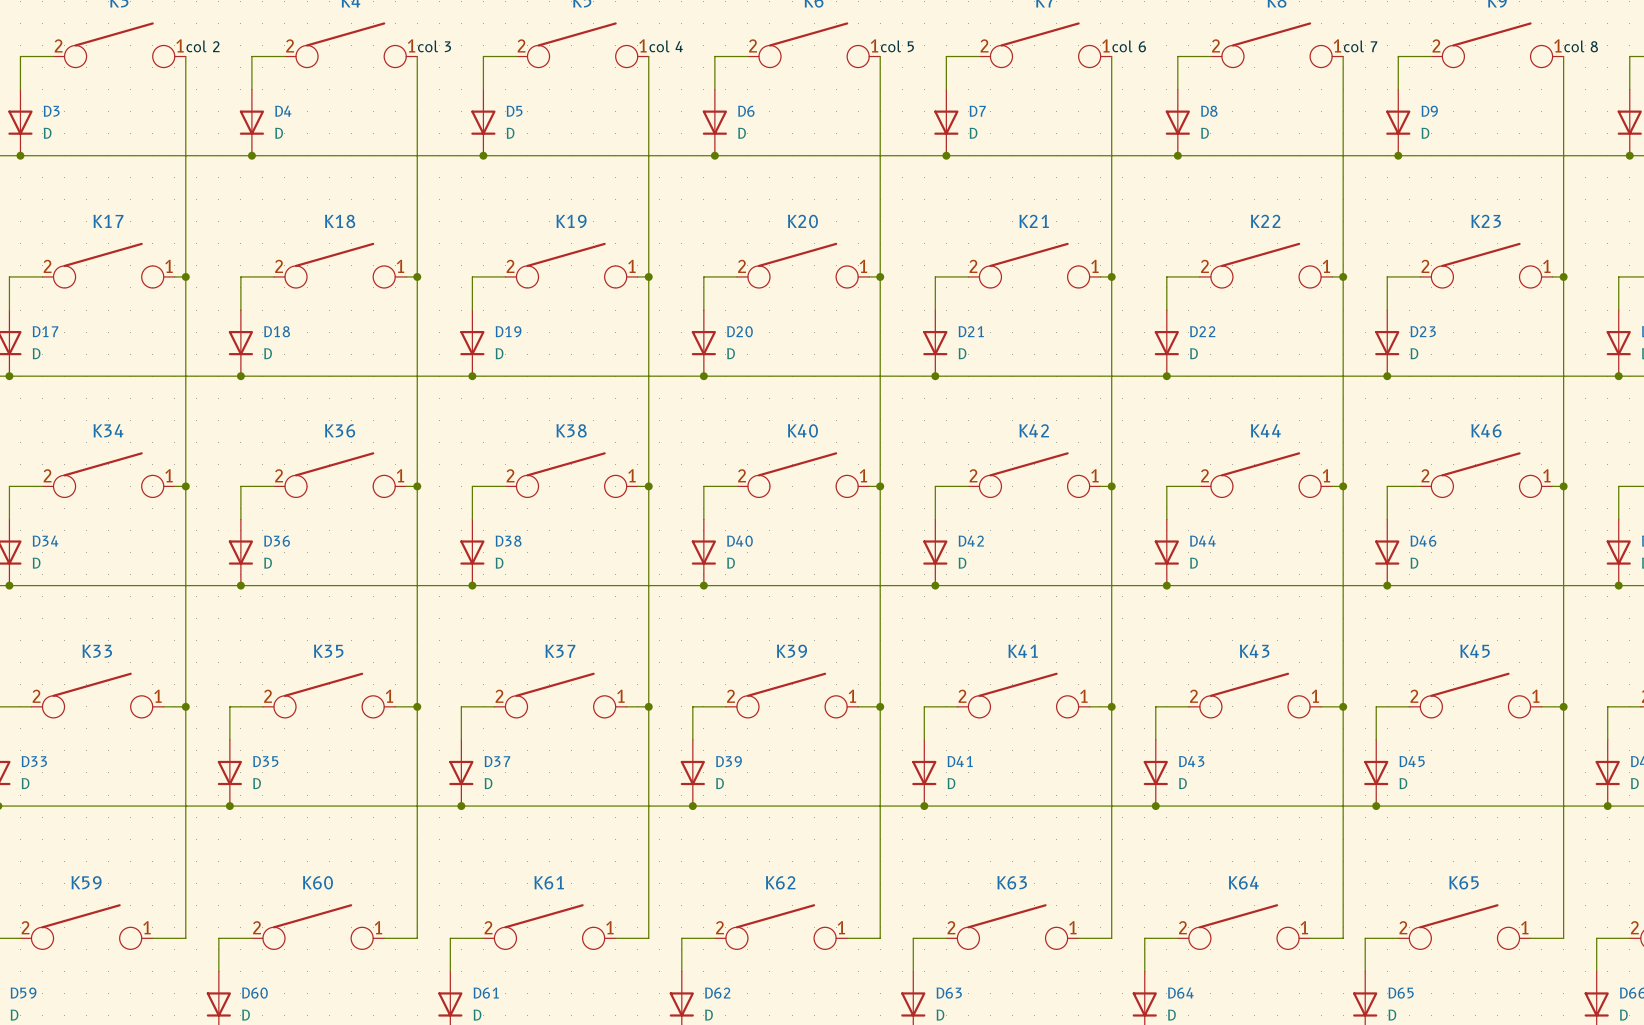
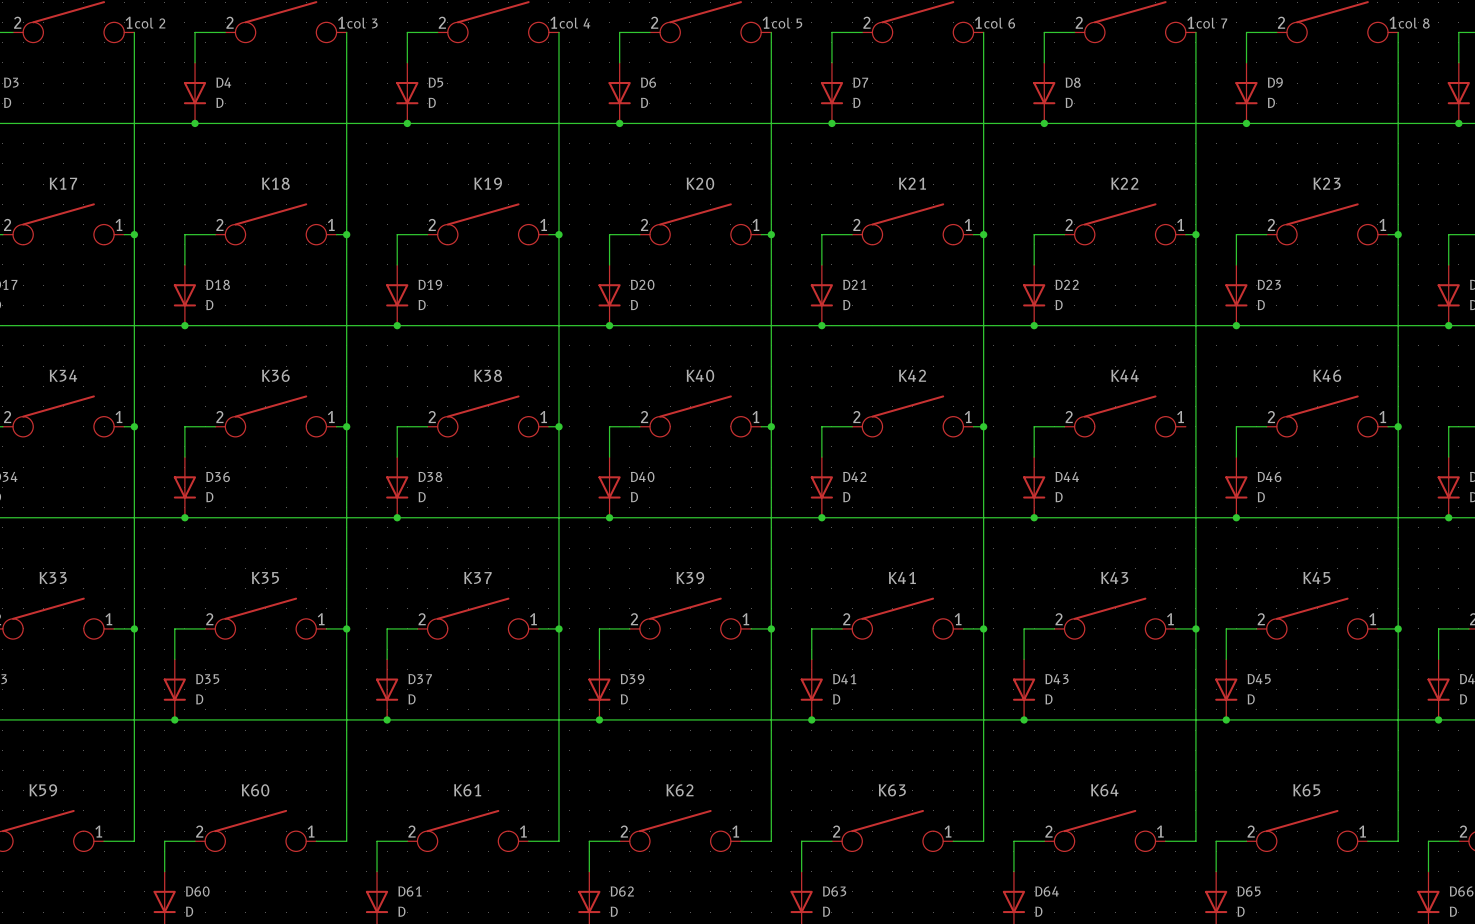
wire: (1332, 486) (1343, 486) -> none
junction: (1343, 486) -> none

